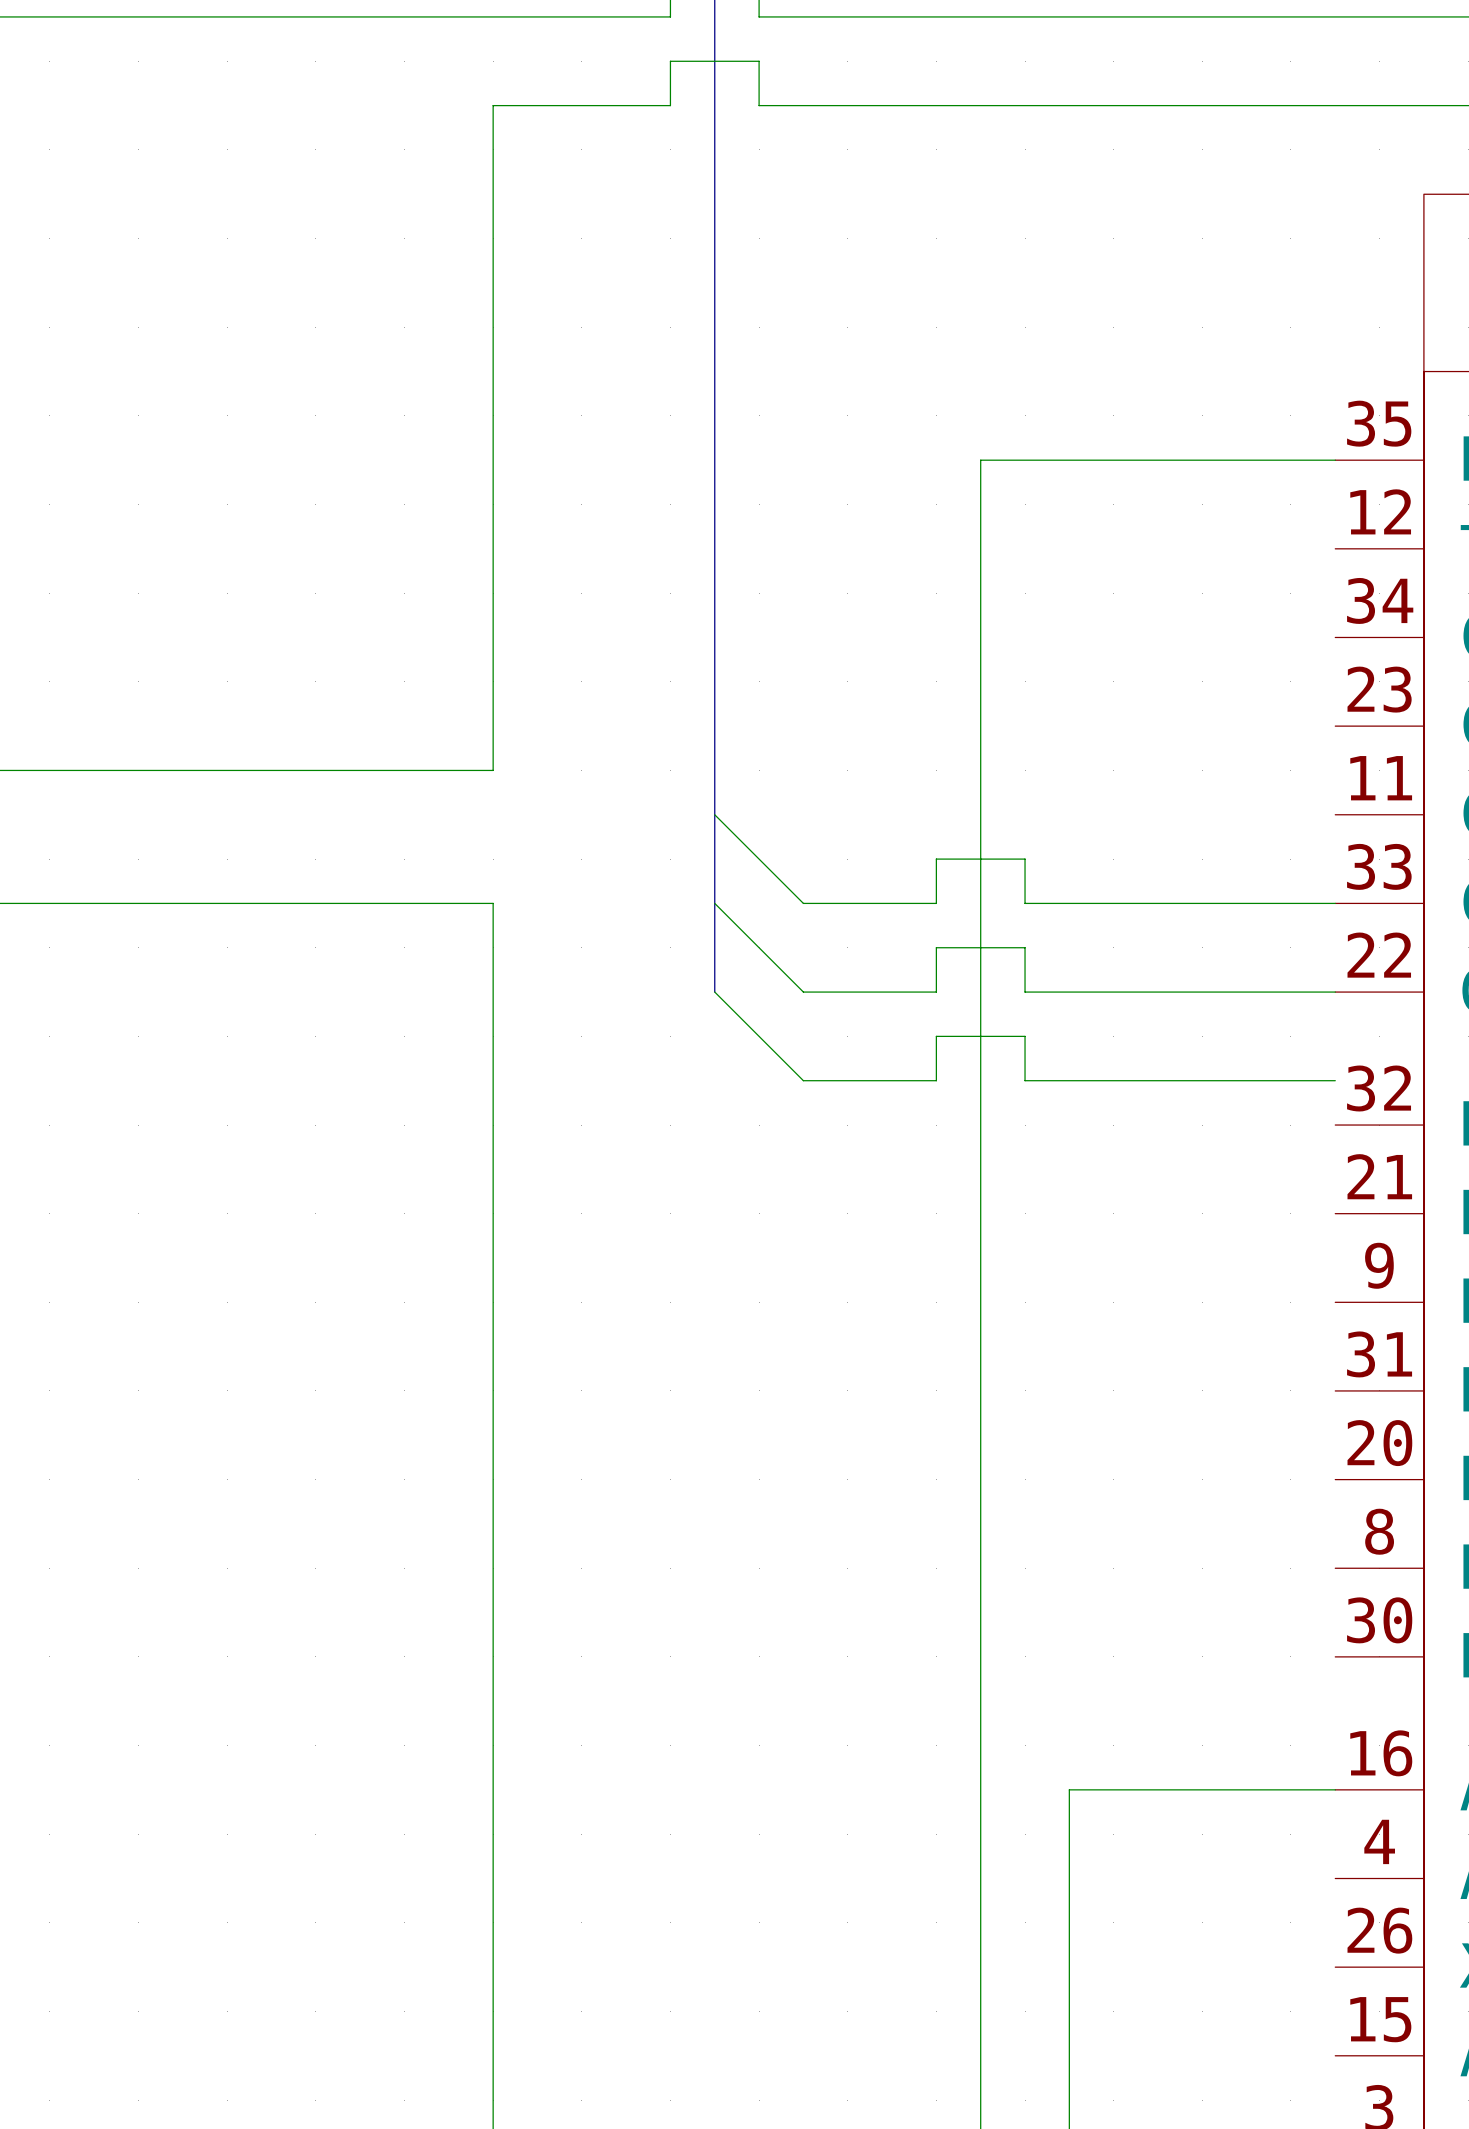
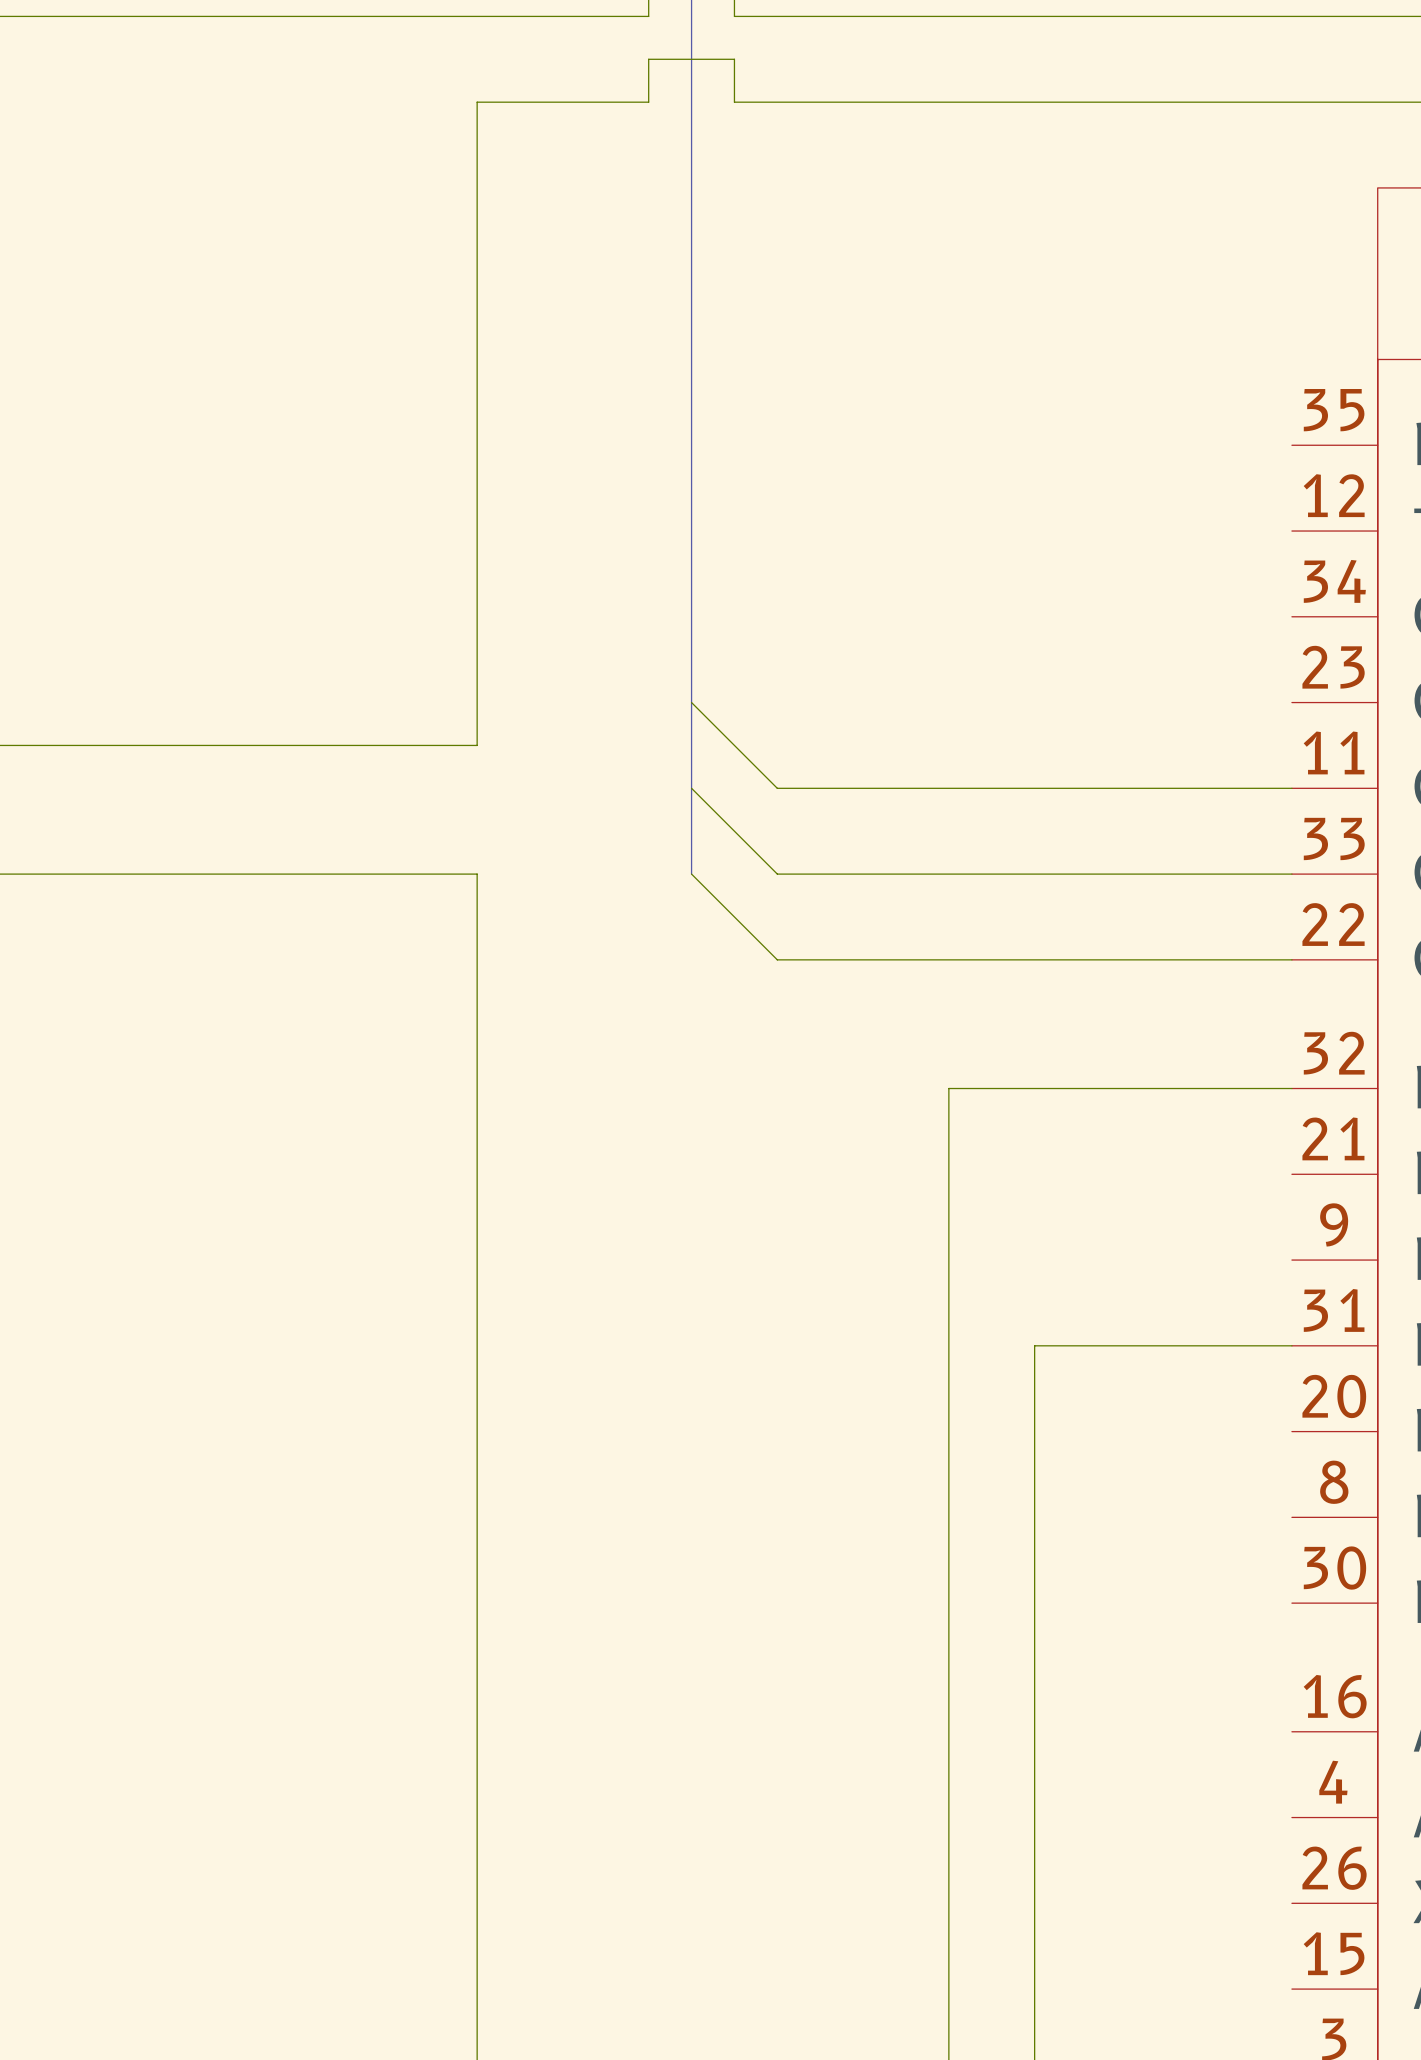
wire: (1335, 460) (980, 460) (980, 1125) -> (1291, 1088) (948, 1088)
wire: none -> (691, 702) (777, 788) (1291, 788)
bus: (714, 903) (714, 992) -> none
wire: (936, 903) (936, 859) (1025, 859) (1025, 903) -> (905, 874) (991, 874)
wire: (714, 992) (803, 1080) (936, 1080) (936, 1036) (1025, 1036) (1025, 1080) (1335, 1080) -> none
wire: (936, 992) (936, 947) (1025, 947) (1025, 992) -> (905, 959) (991, 959)
wire: (1069, 1789) (1335, 1789) -> (1034, 1731) (1034, 1345) (1291, 1345)

